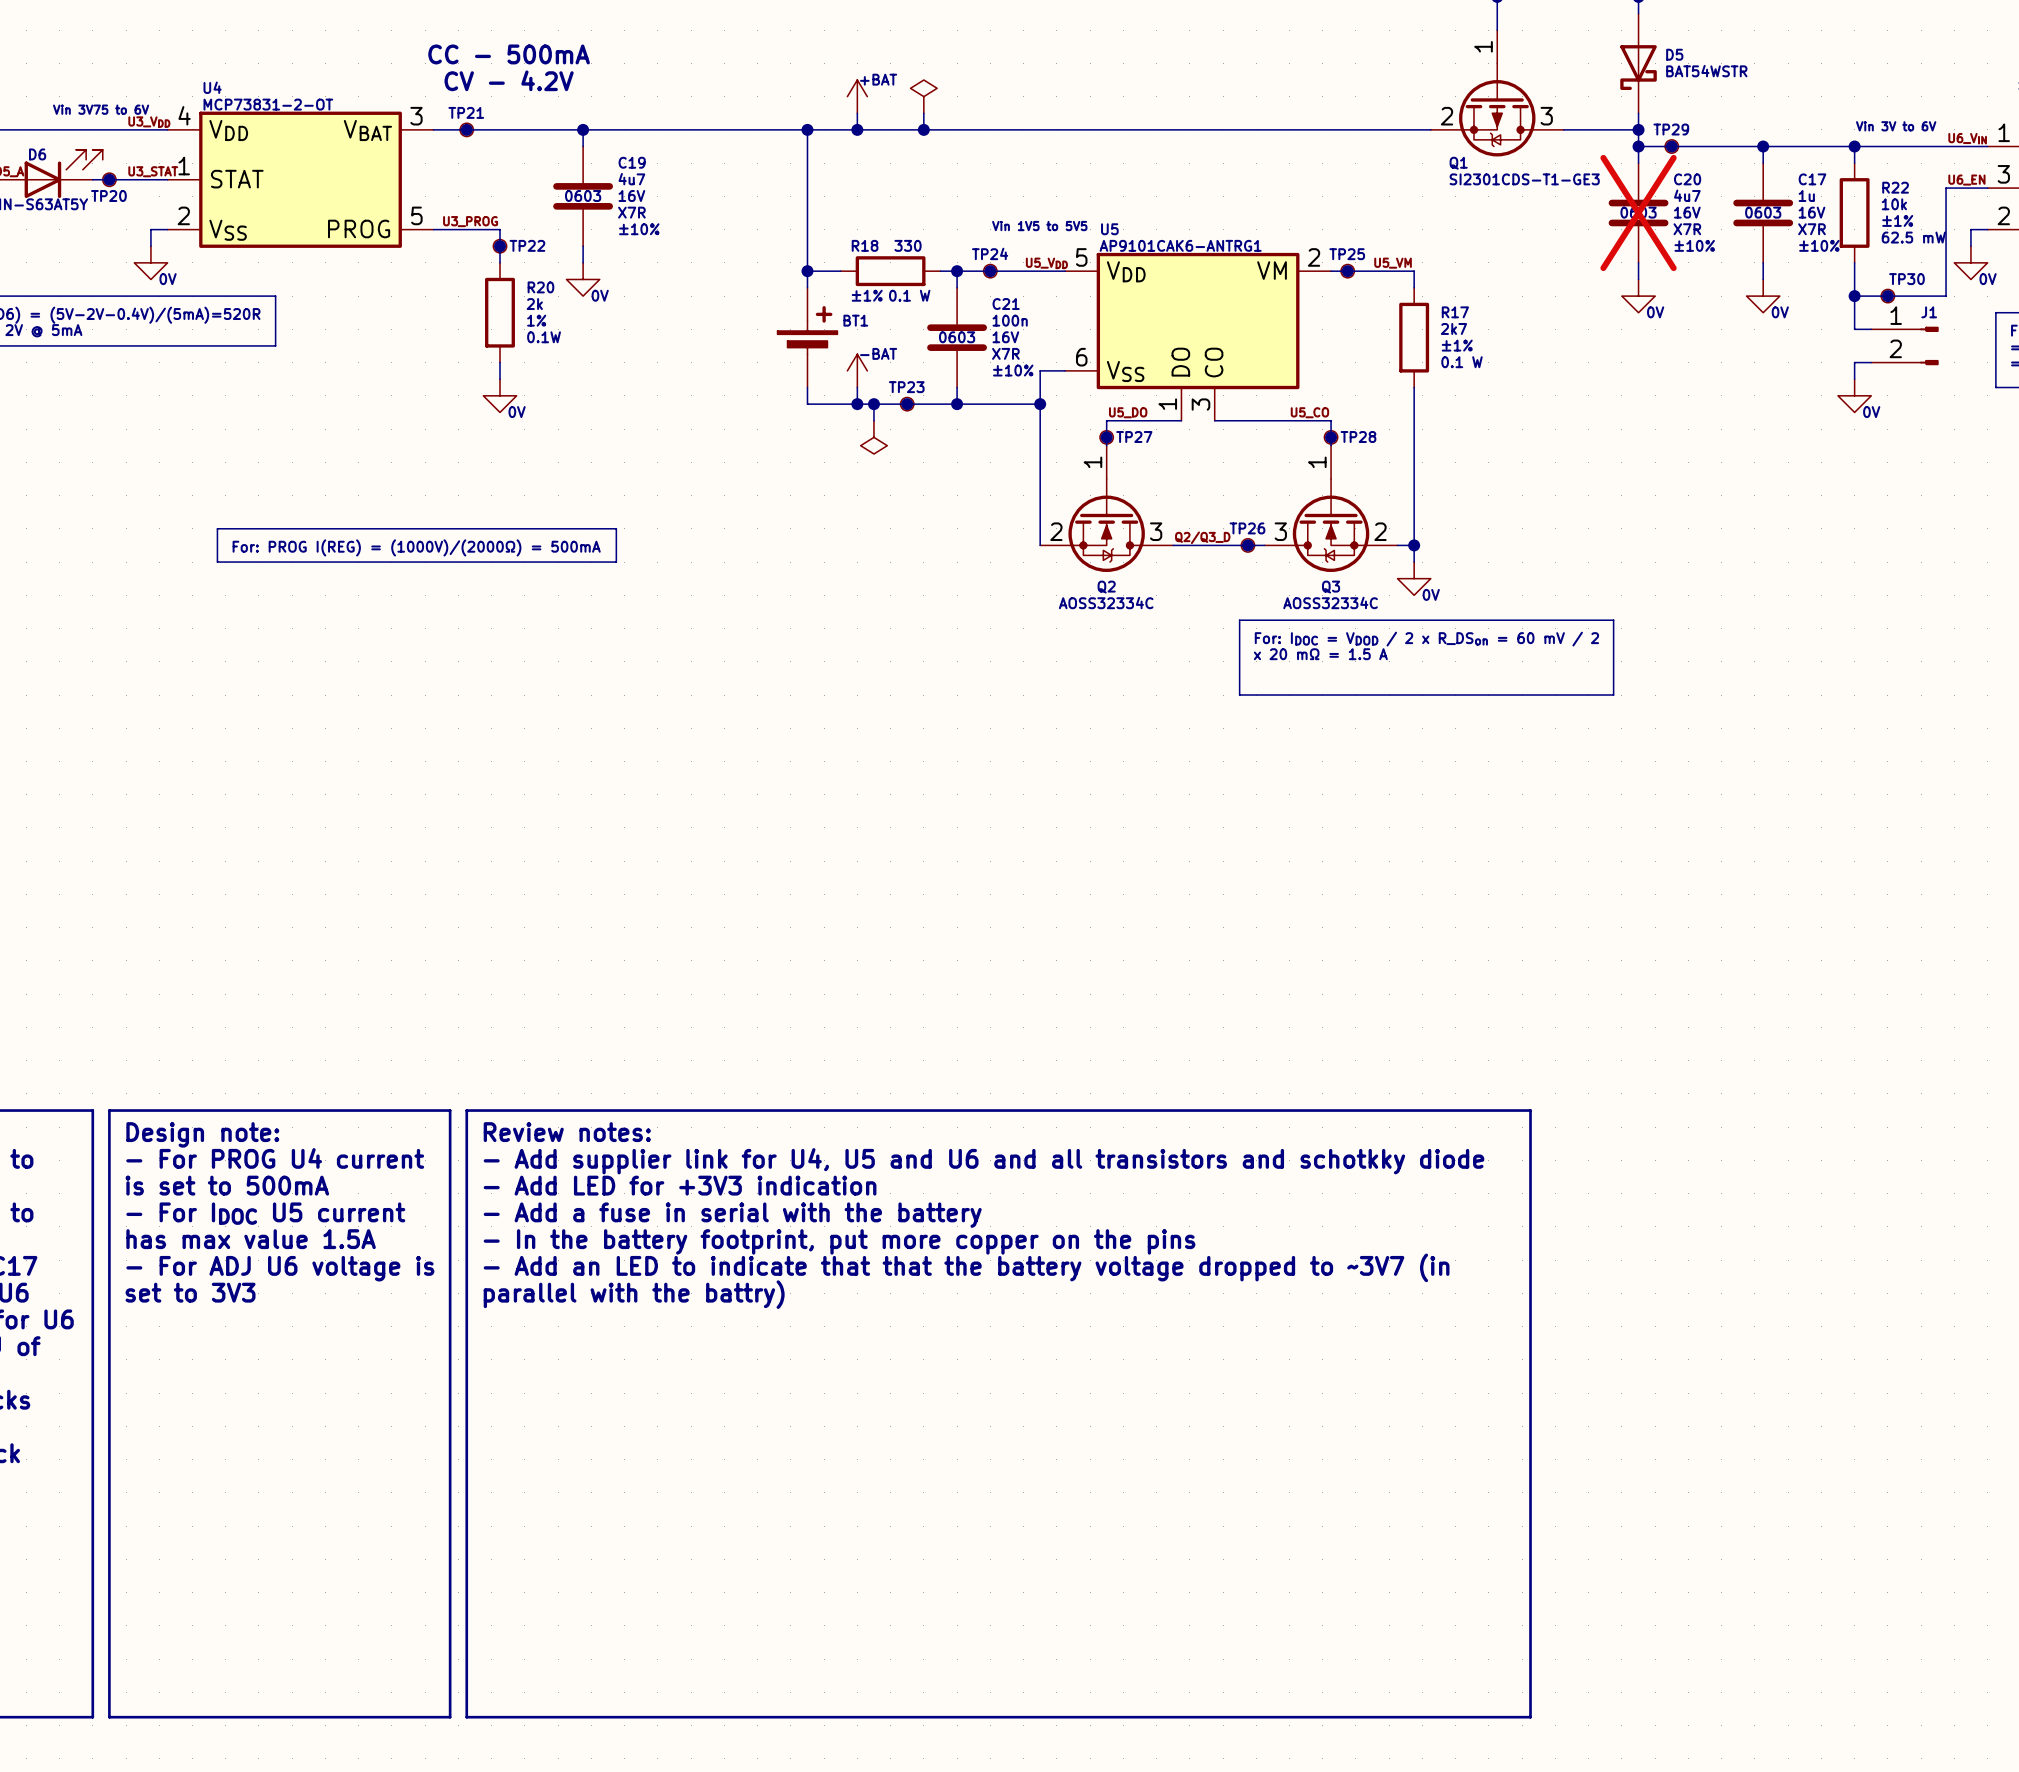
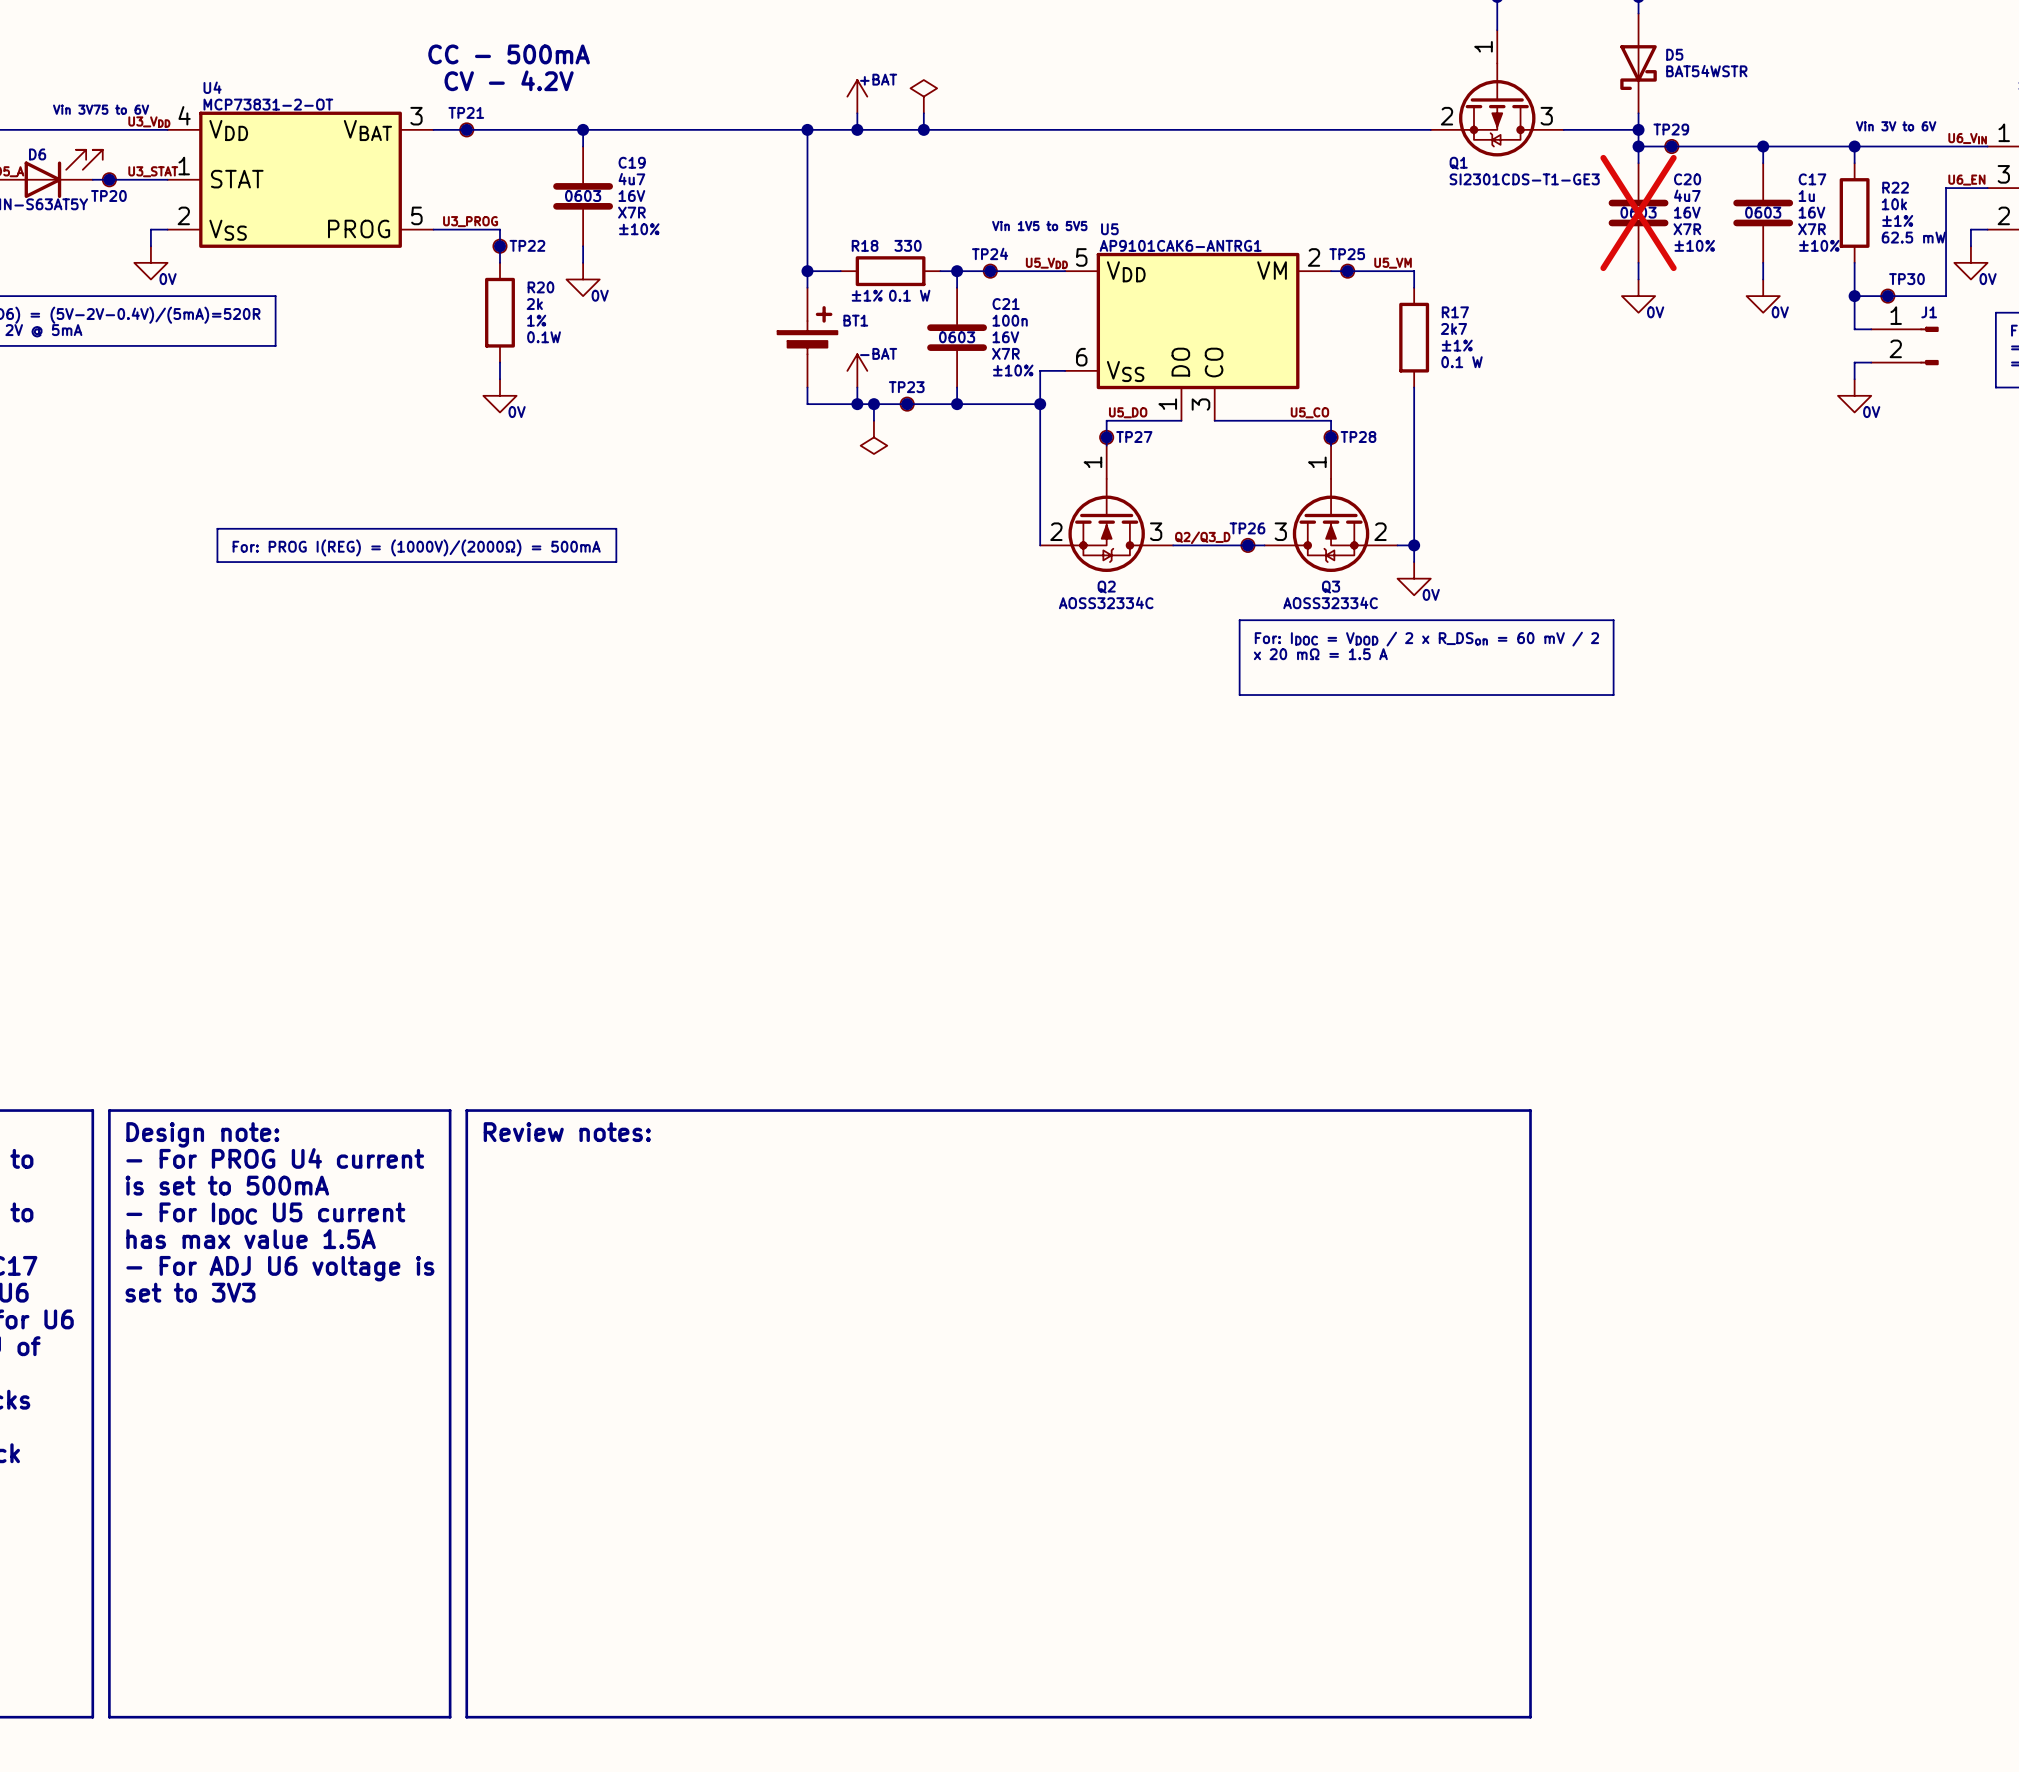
text: - Add supplier link for U4, U5 and U6 and all transistors and schotkky diode (983, 1161) -> none
text: - Add LED for +3V3 indication (680, 1185) -> none
text: - Add a fuse in serial with the battery (732, 1215) -> none
text: - In the battery footprint, put more copper on the pins (839, 1241) -> none
text: - Add an LED to indicate that that the battery voltage dropped to ~3V7 (in (966, 1267) -> none
text: parallel with the battry) (634, 1294) -> none

